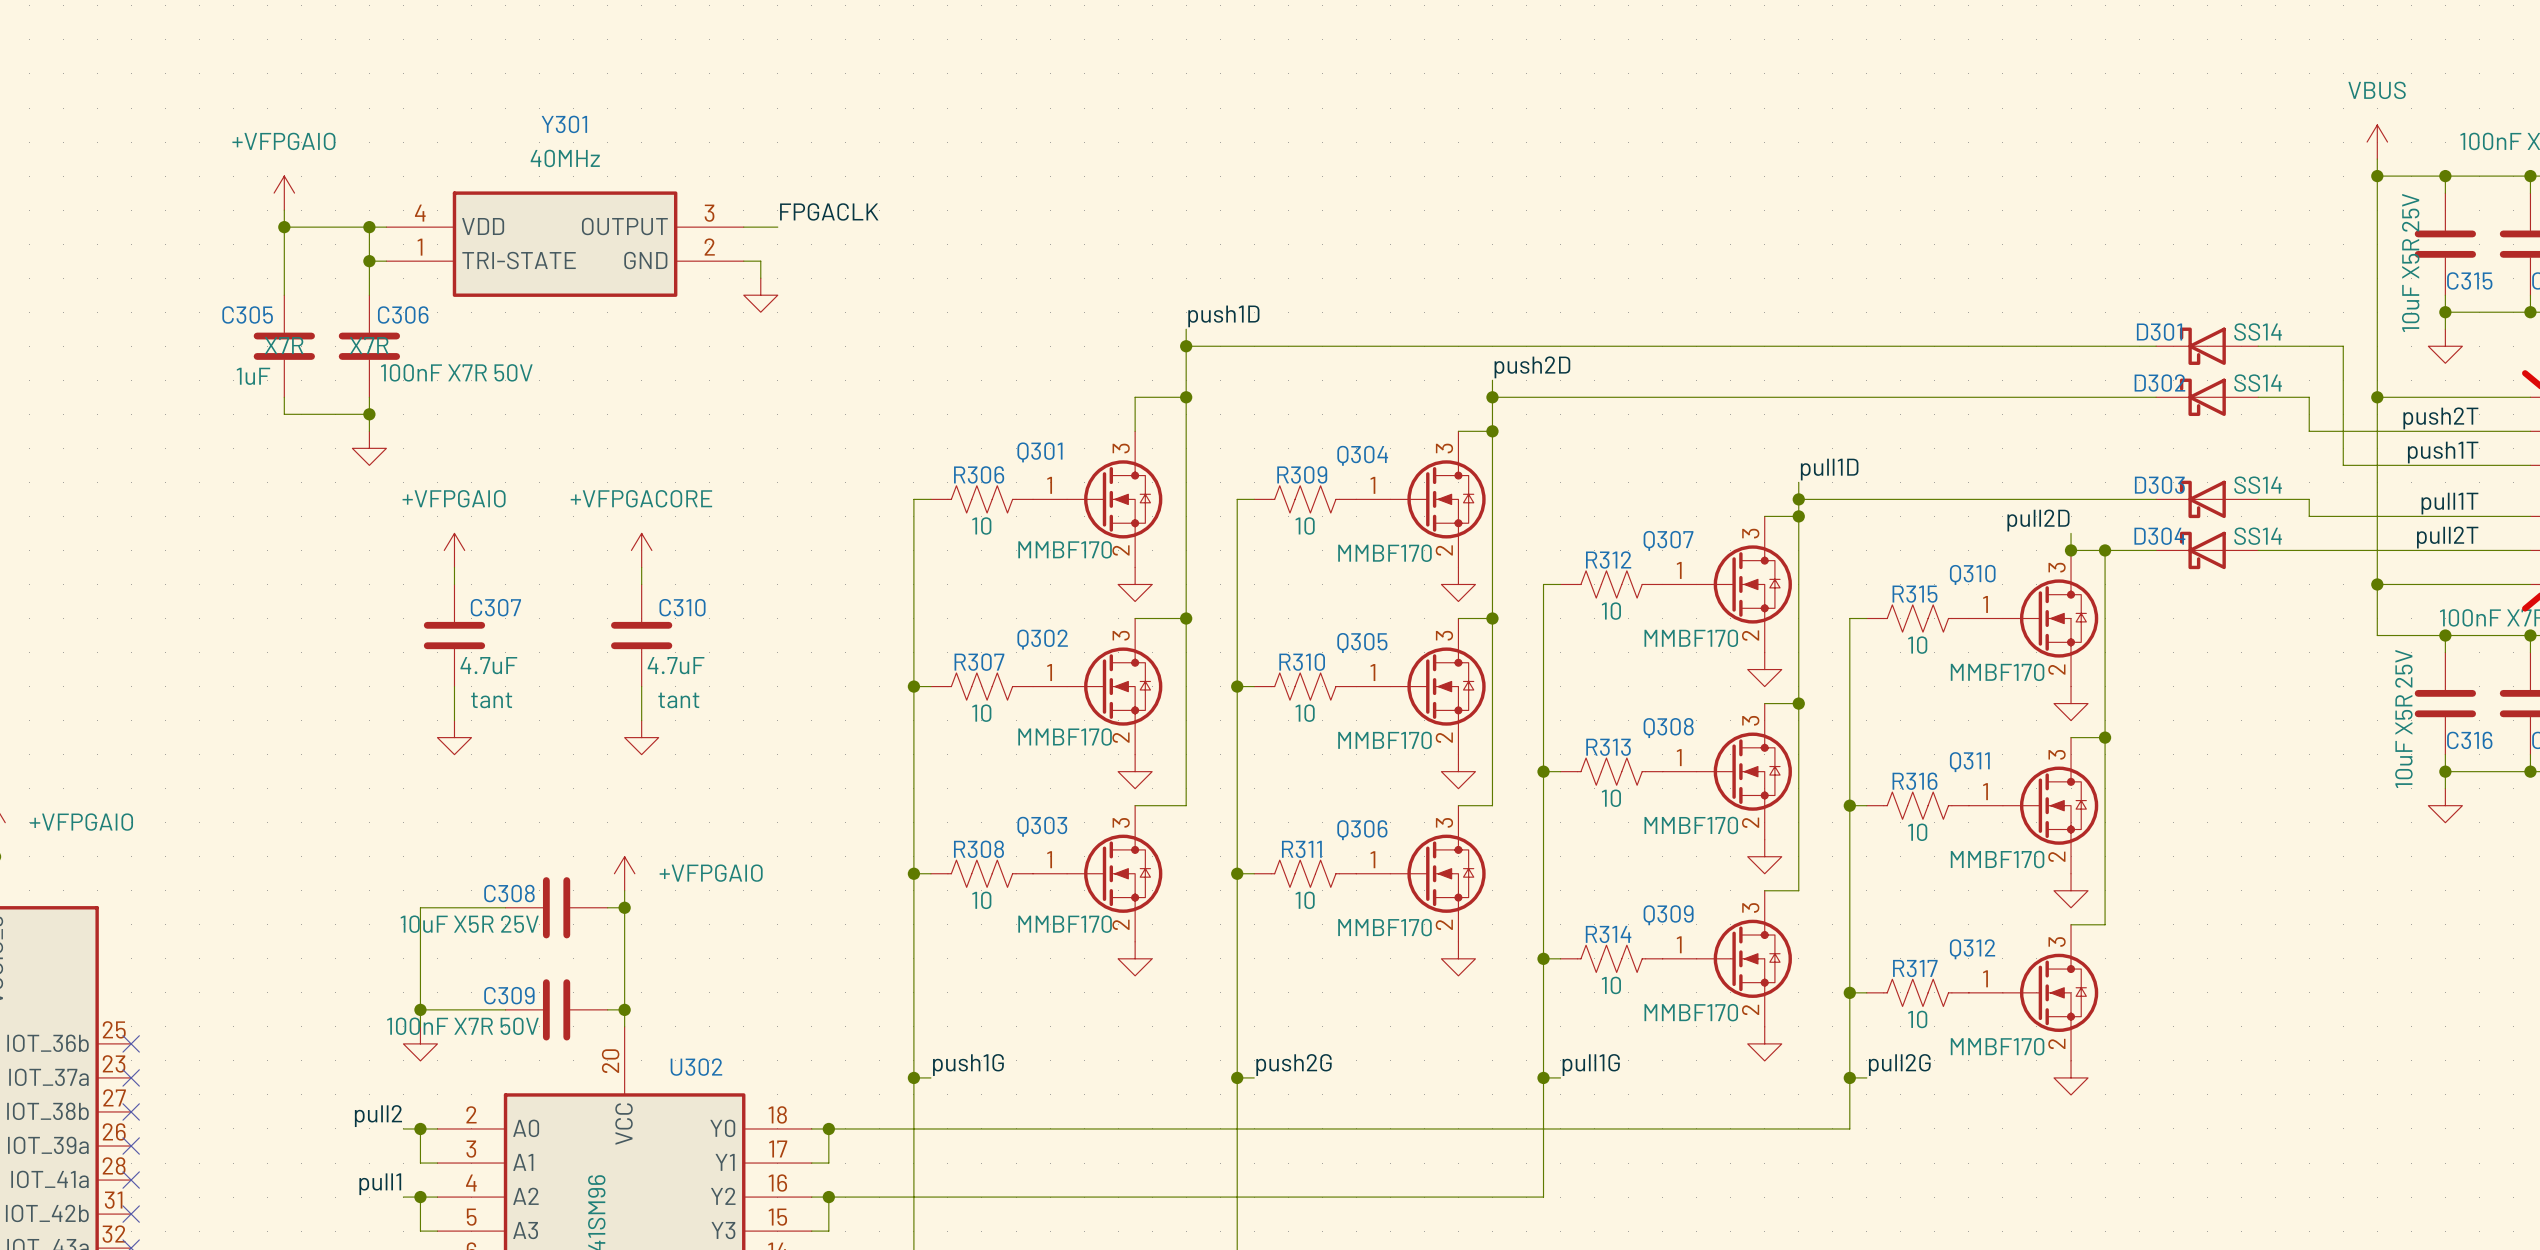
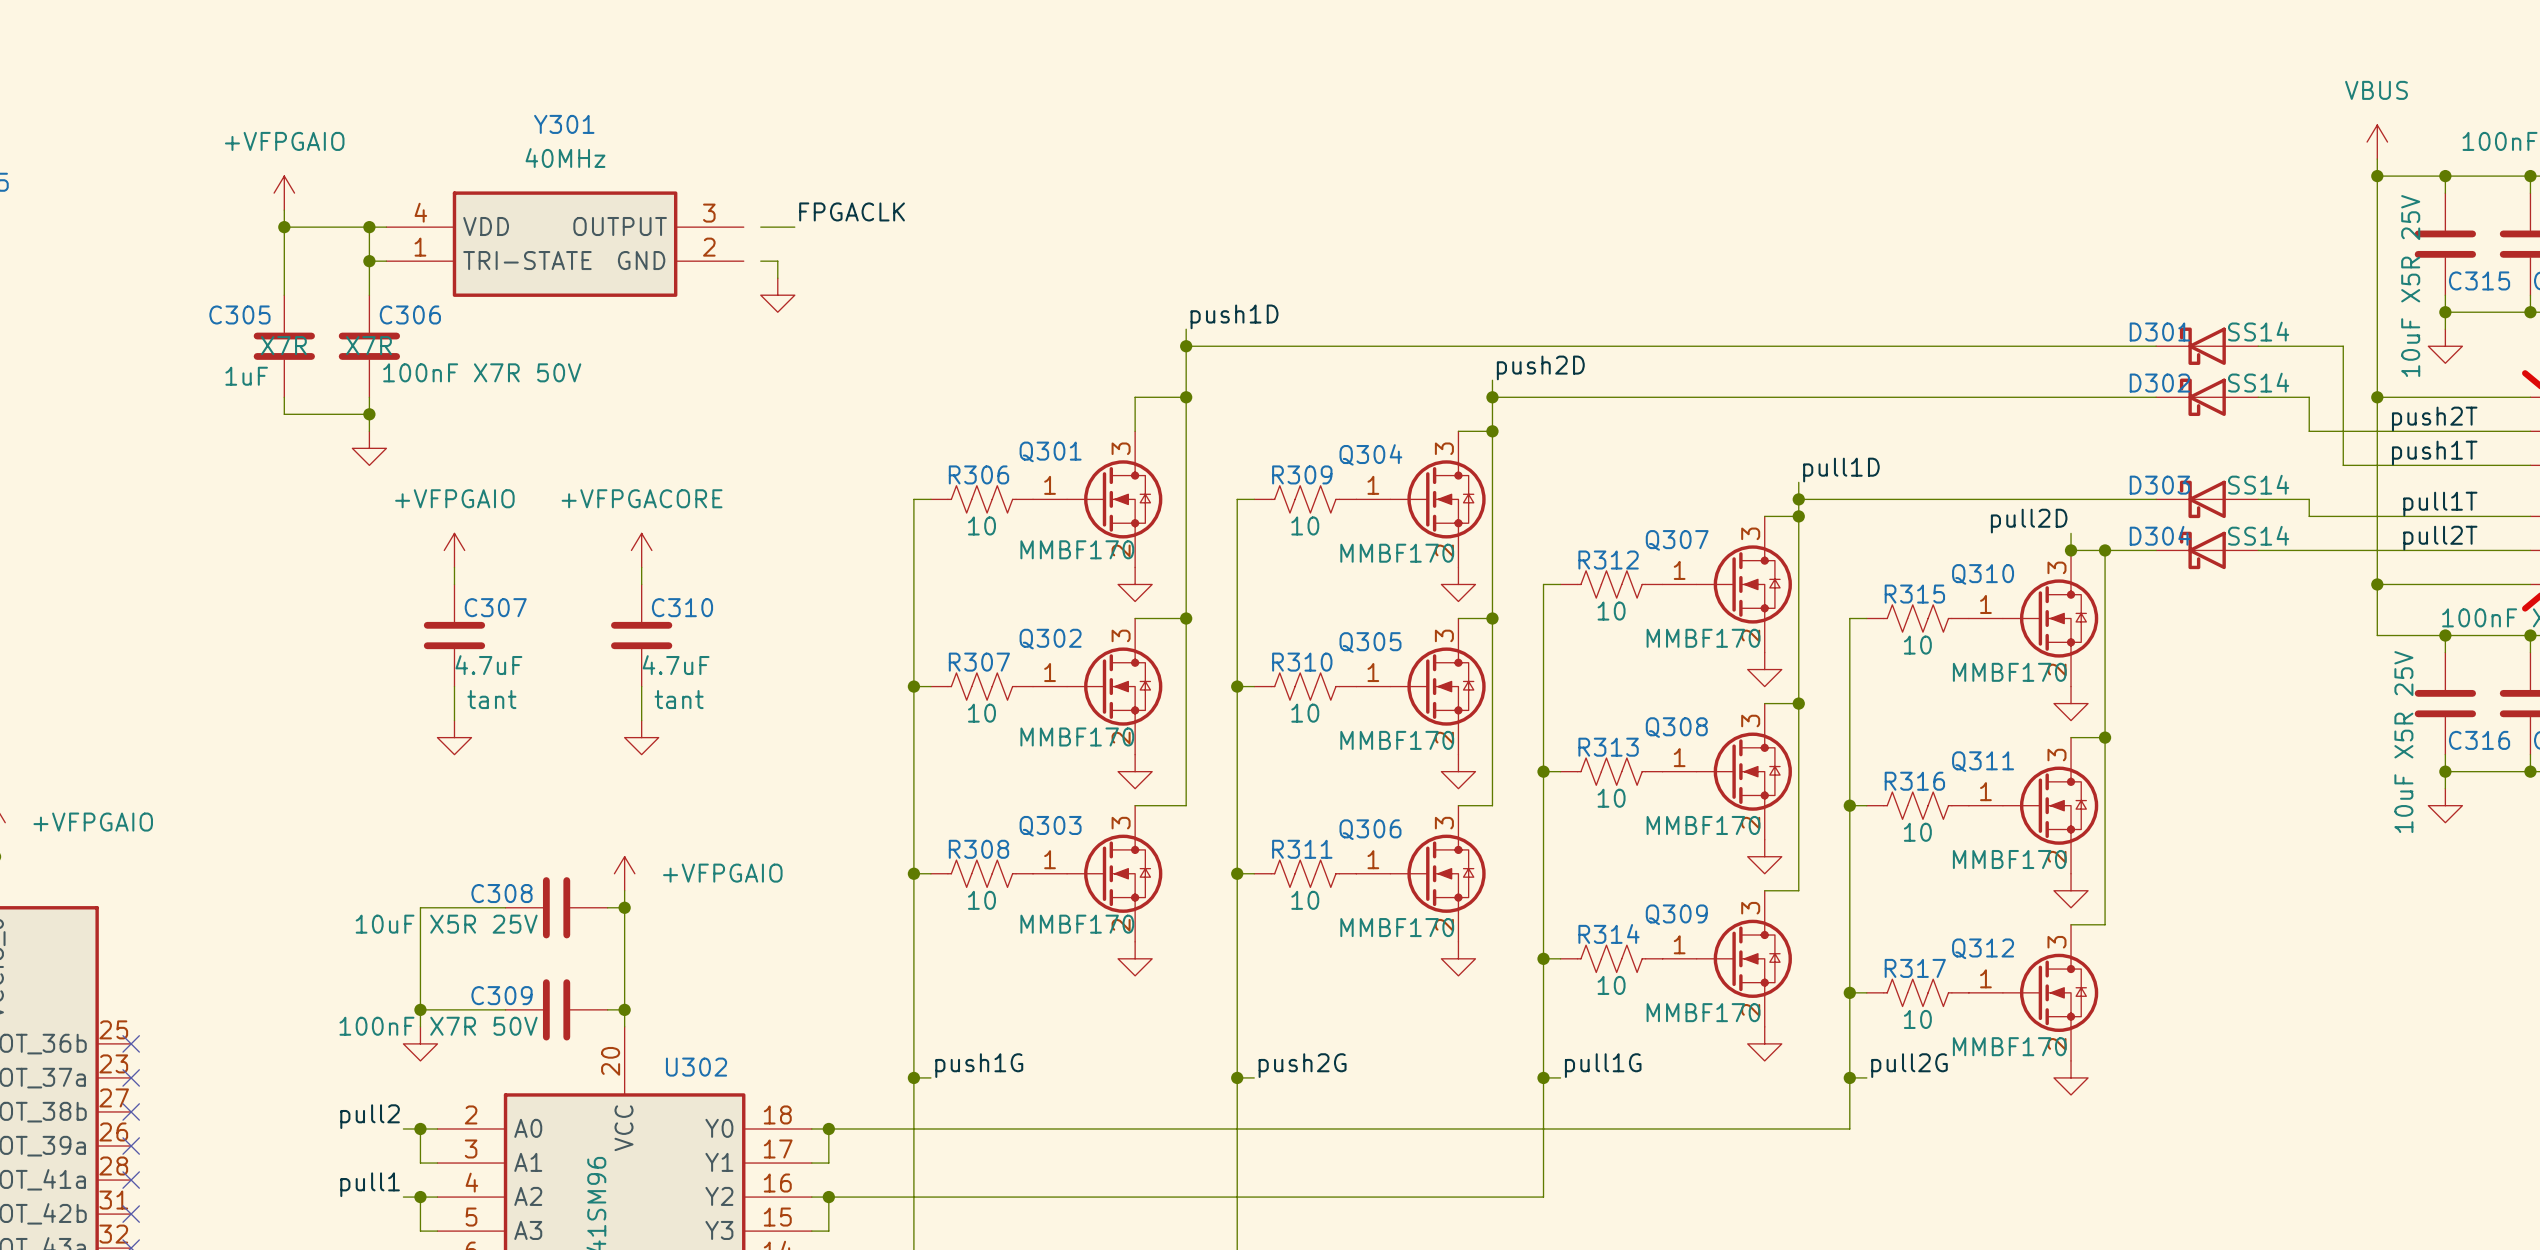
label position: FPGACLK (829, 211) -> FPGACLK (852, 211)
wire: (743, 227) (760, 227) -> (777, 227) (794, 227)
wire: (743, 261) (760, 261) (760, 278) -> (760, 261) (777, 261) (777, 278)
power symbol position: (760, 295) -> (777, 295)

